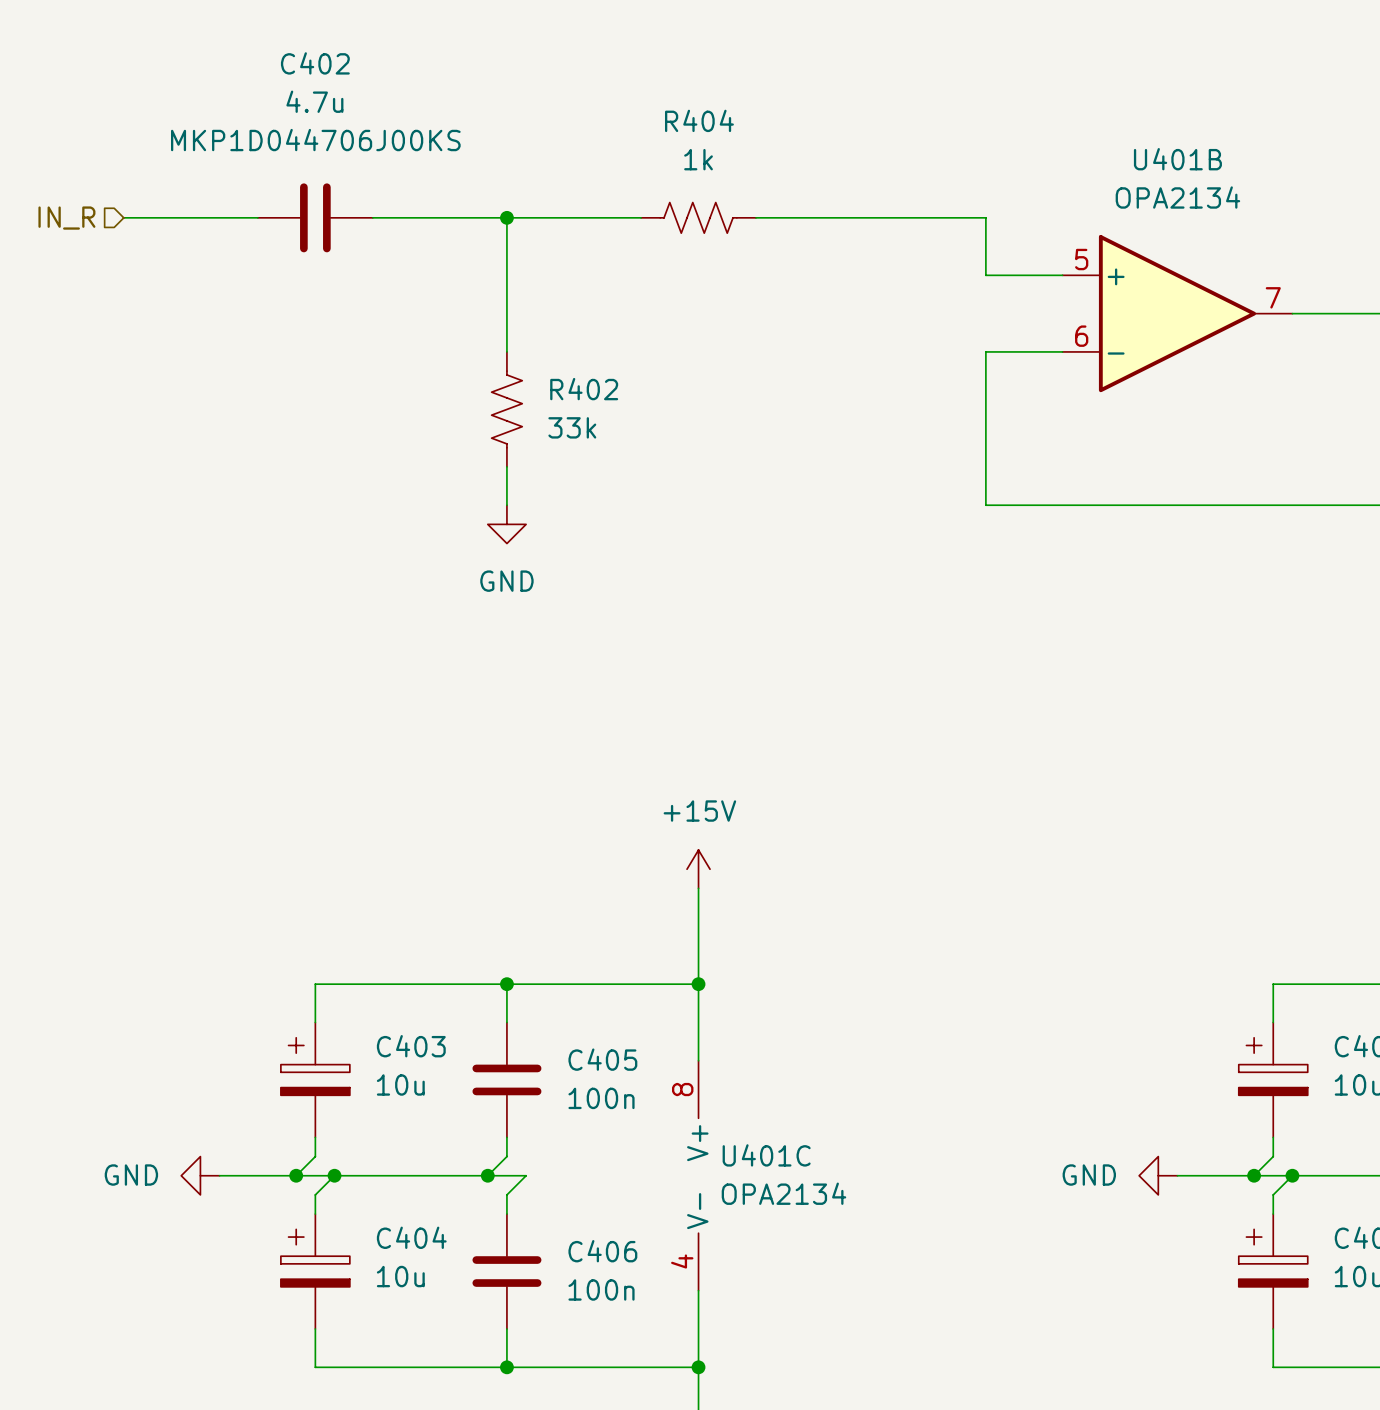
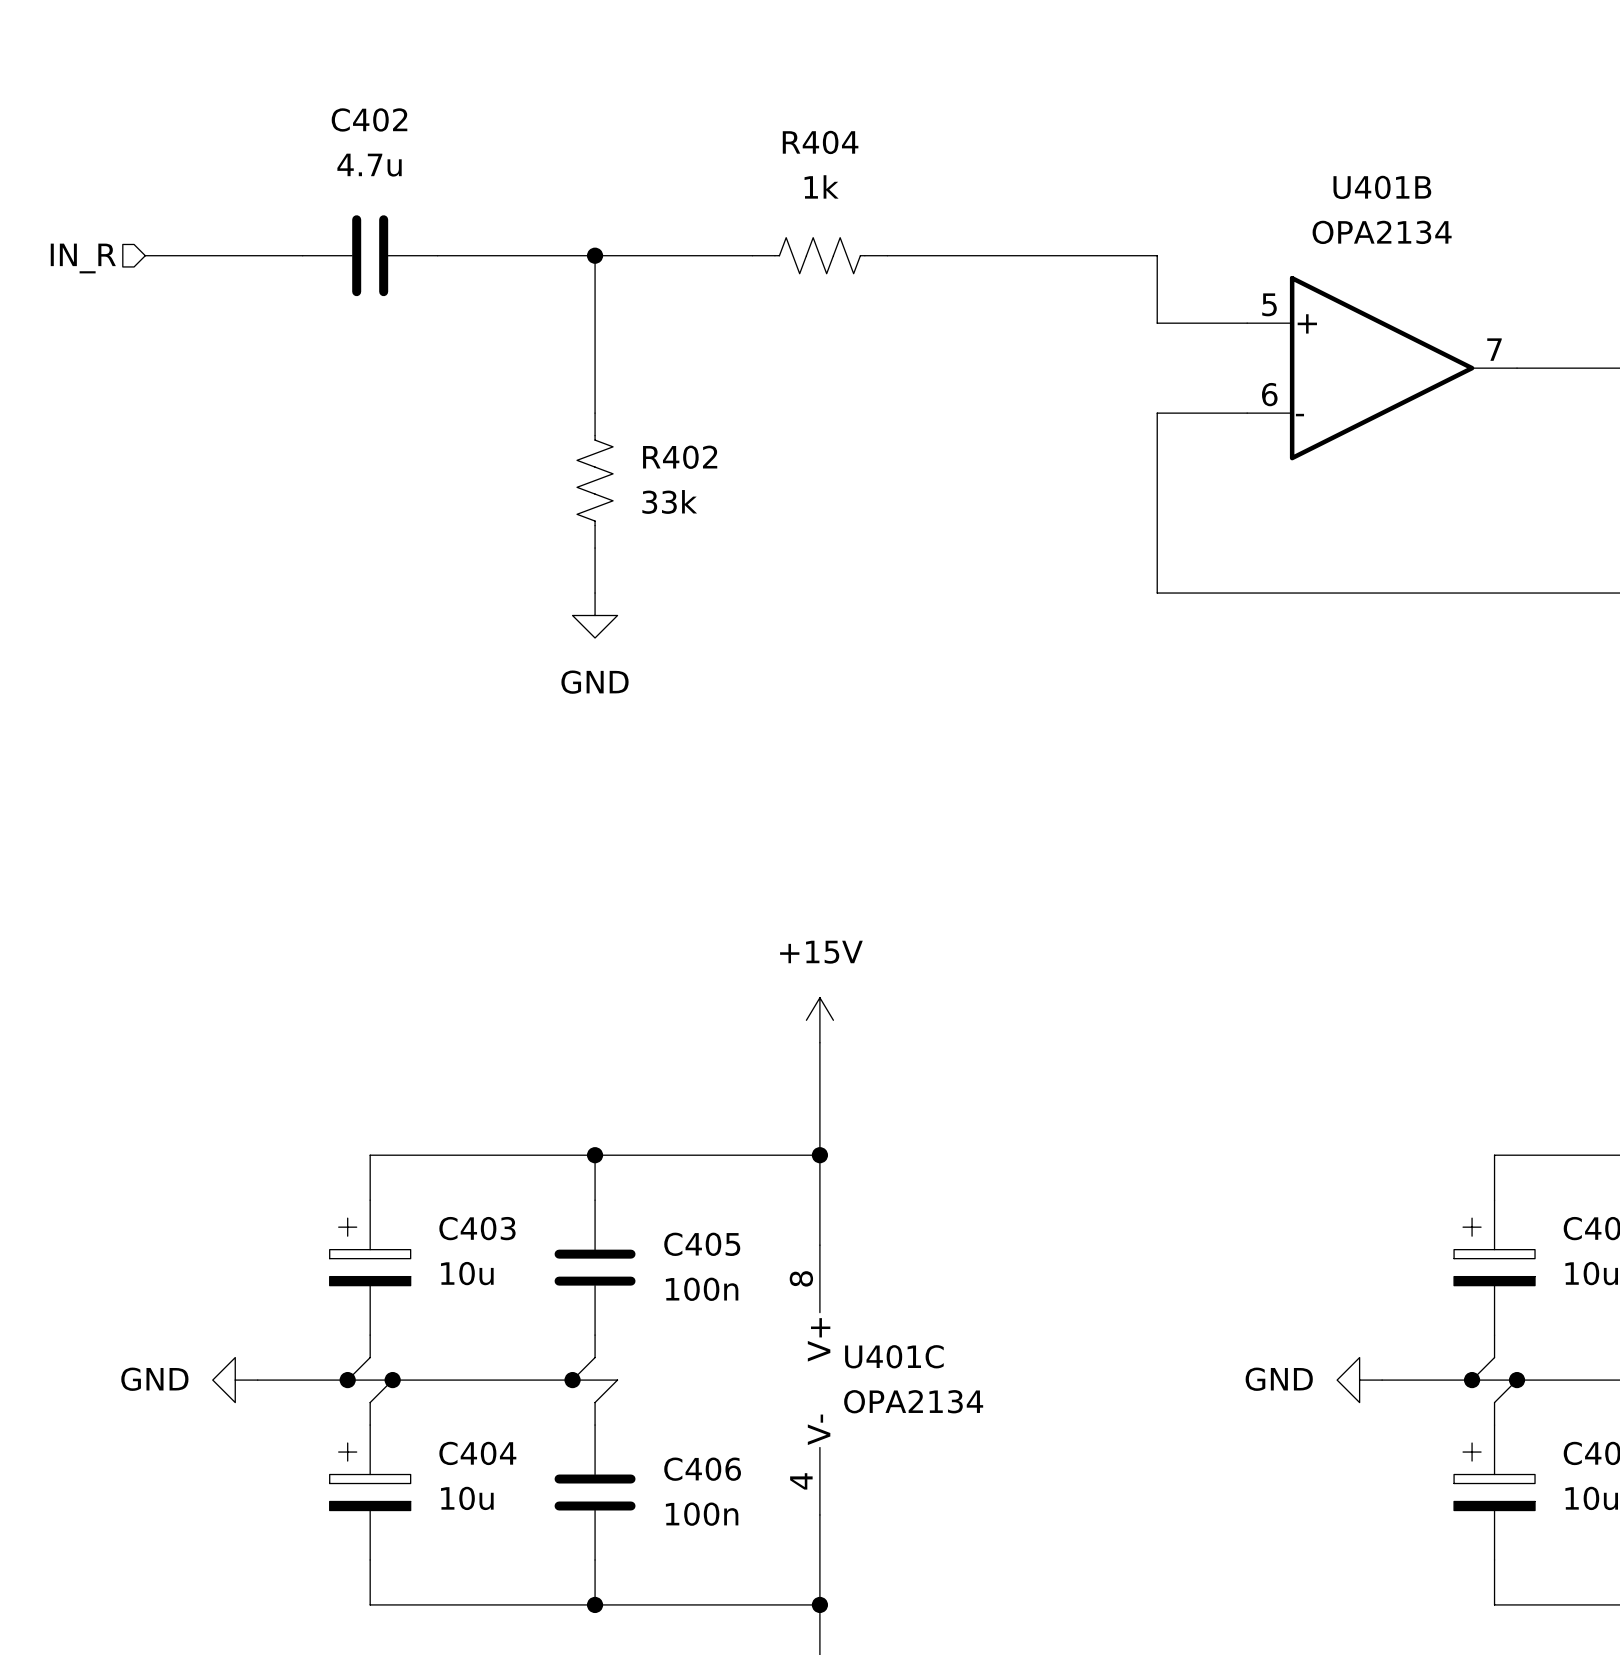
C402 name position: C402 (315, 63) -> C402 (369, 119)
C402 value position: 4.7u (314, 101) -> 4.7u (369, 165)
C402 text: MKP1D044706J00KS (315, 140) -> none

